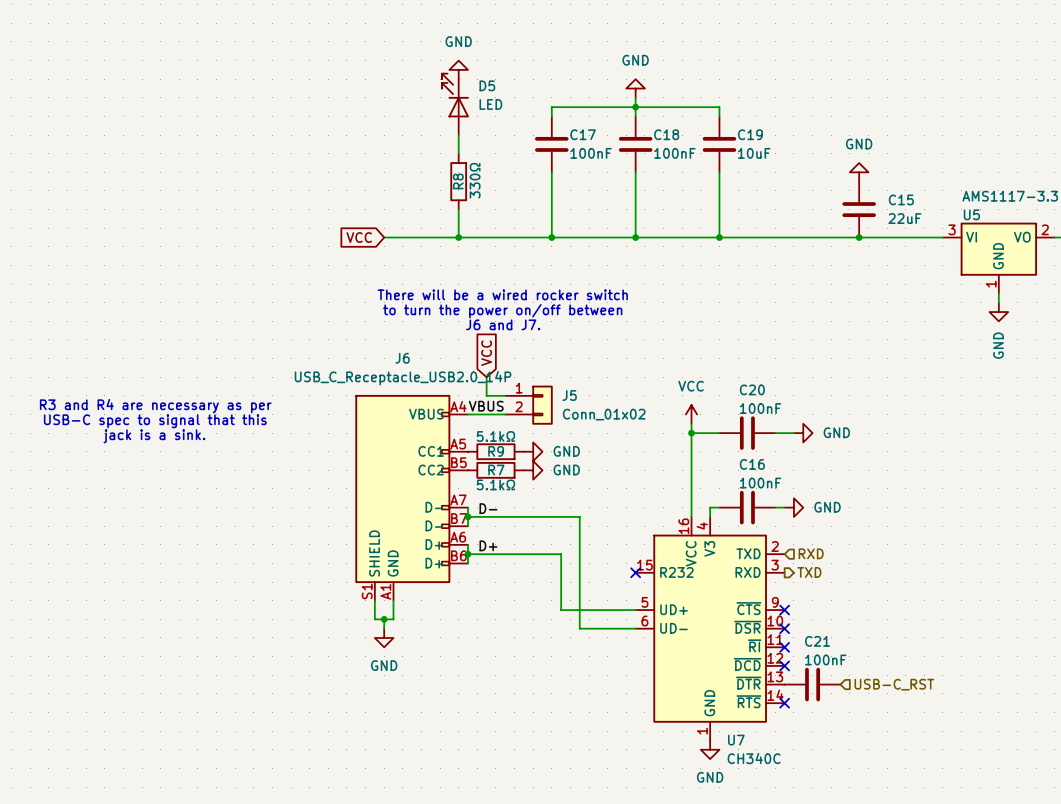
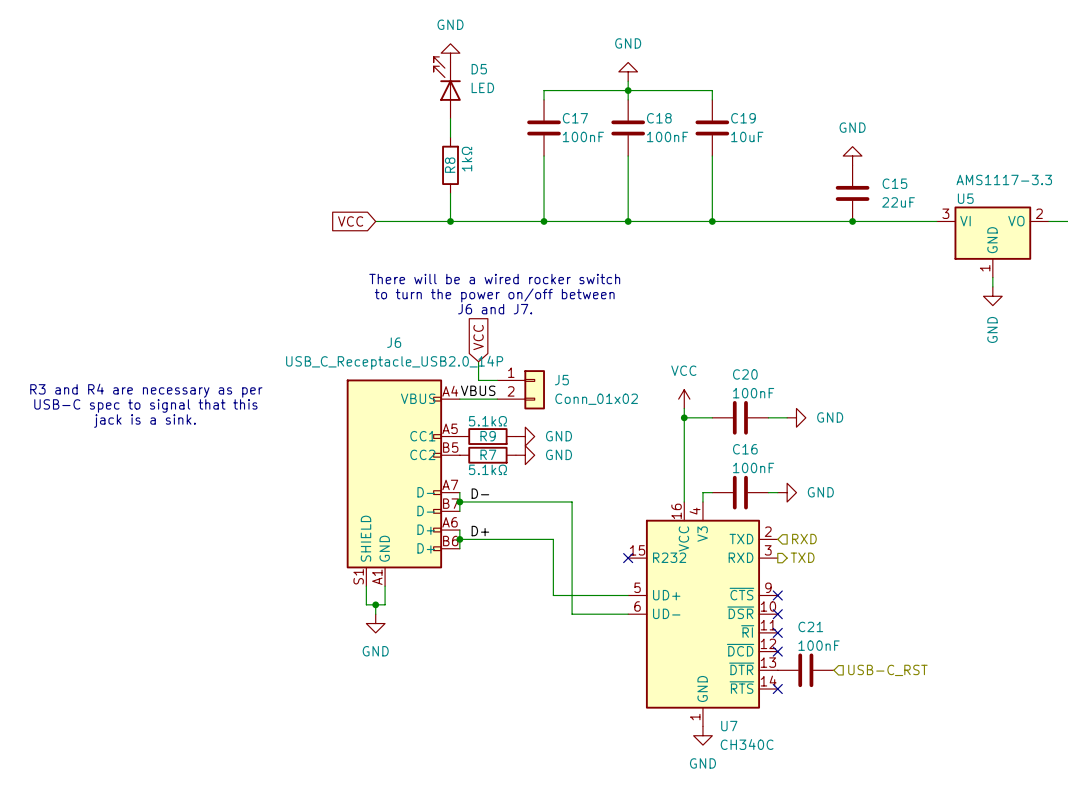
R8 value: 330Ω (475, 180) -> 1kΩ (466, 159)

